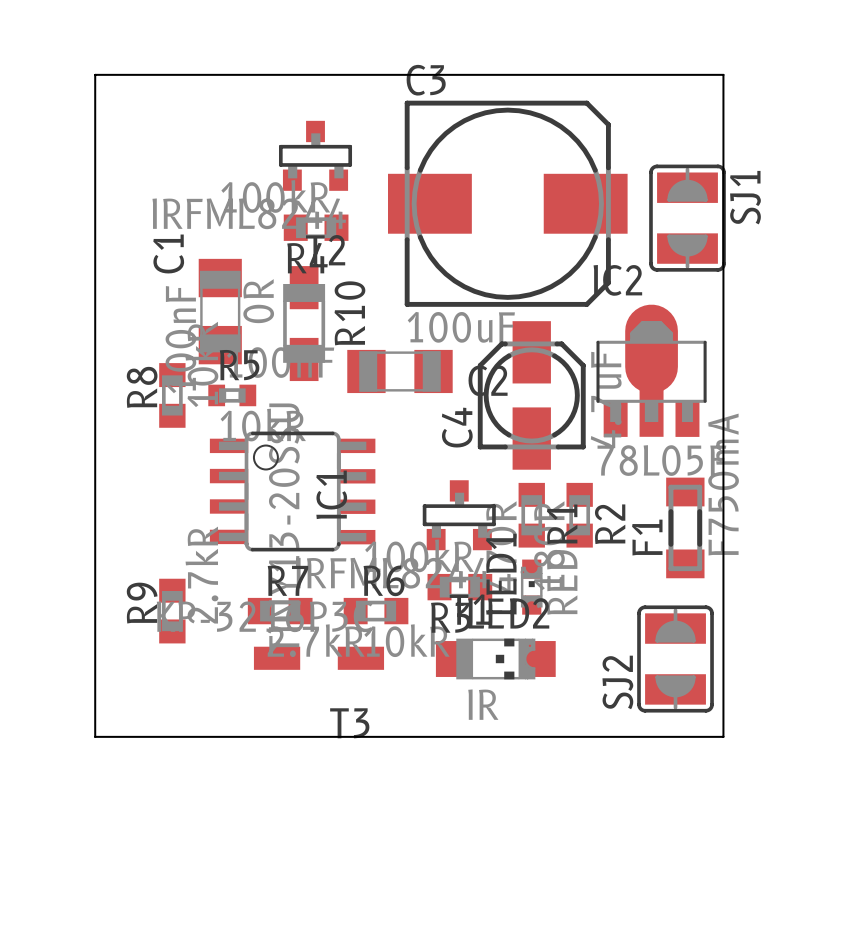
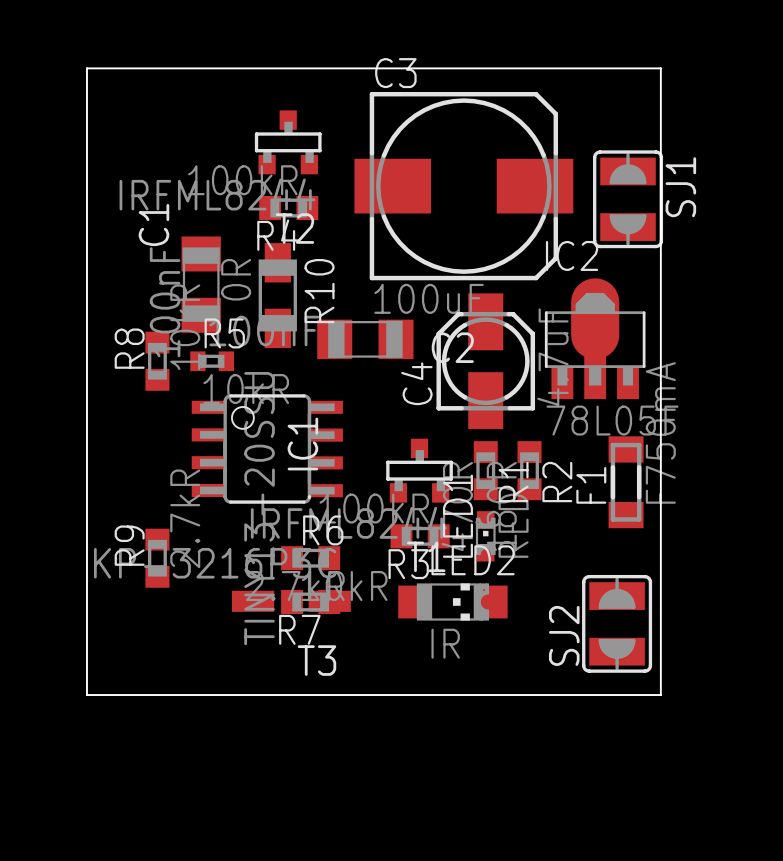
R7 name position: R7 (287, 580) -> R7 (299, 629)
R7 position: (280, 611) -> (310, 601)
R6 position: (376, 611) -> (310, 558)
SJ2 position: (675, 659) -> (617, 623)
board edge: (95, 736) (723, 736) -> (86, 673) (86, 695) (660, 695) (660, 673)

